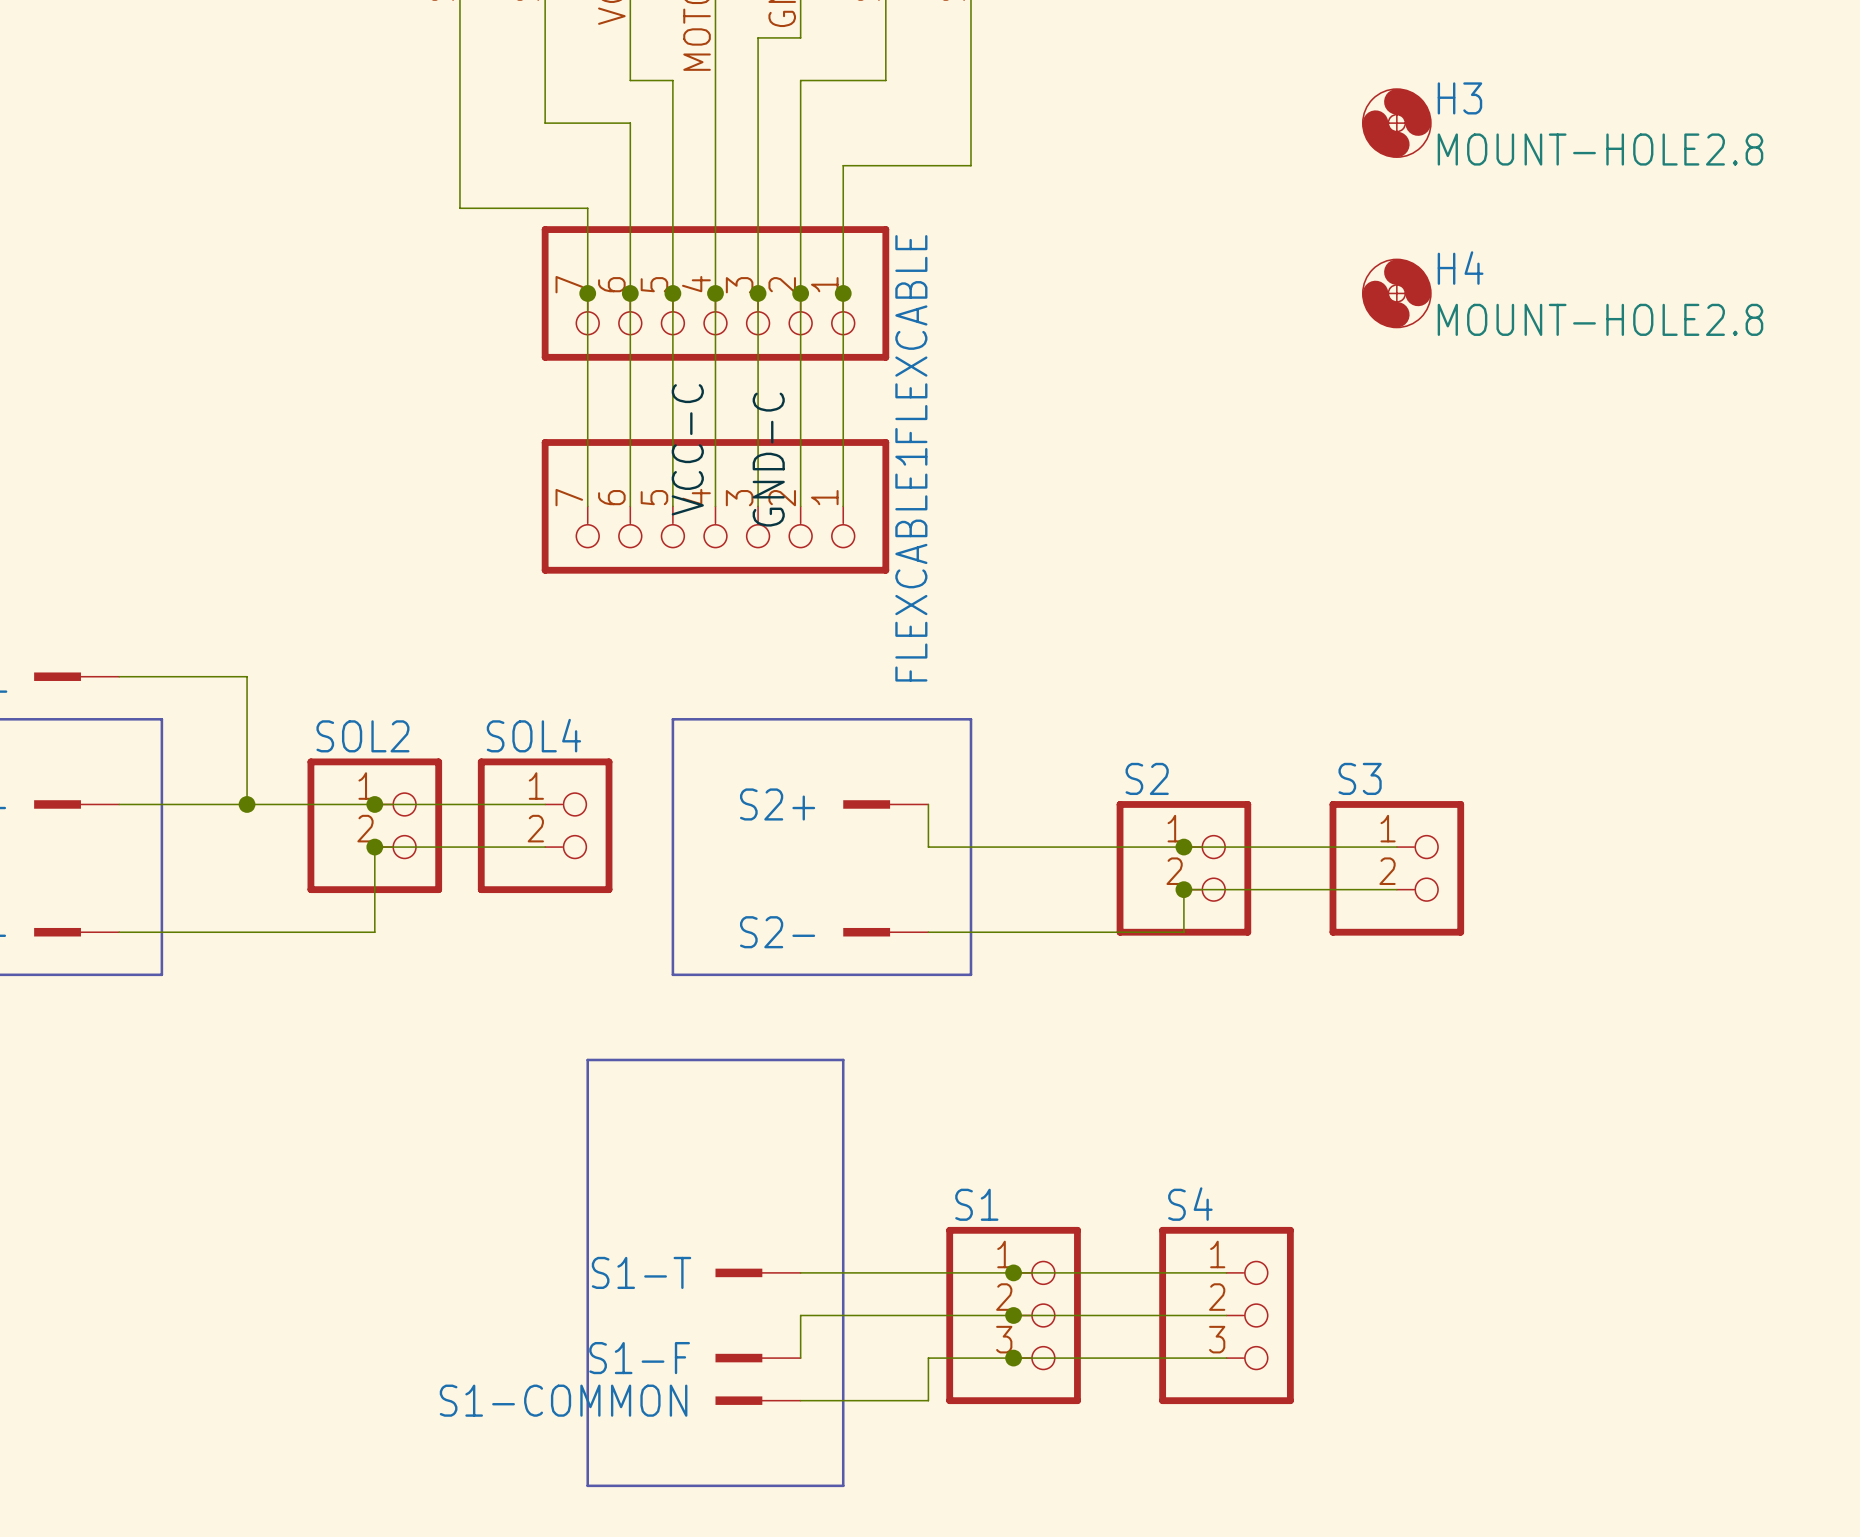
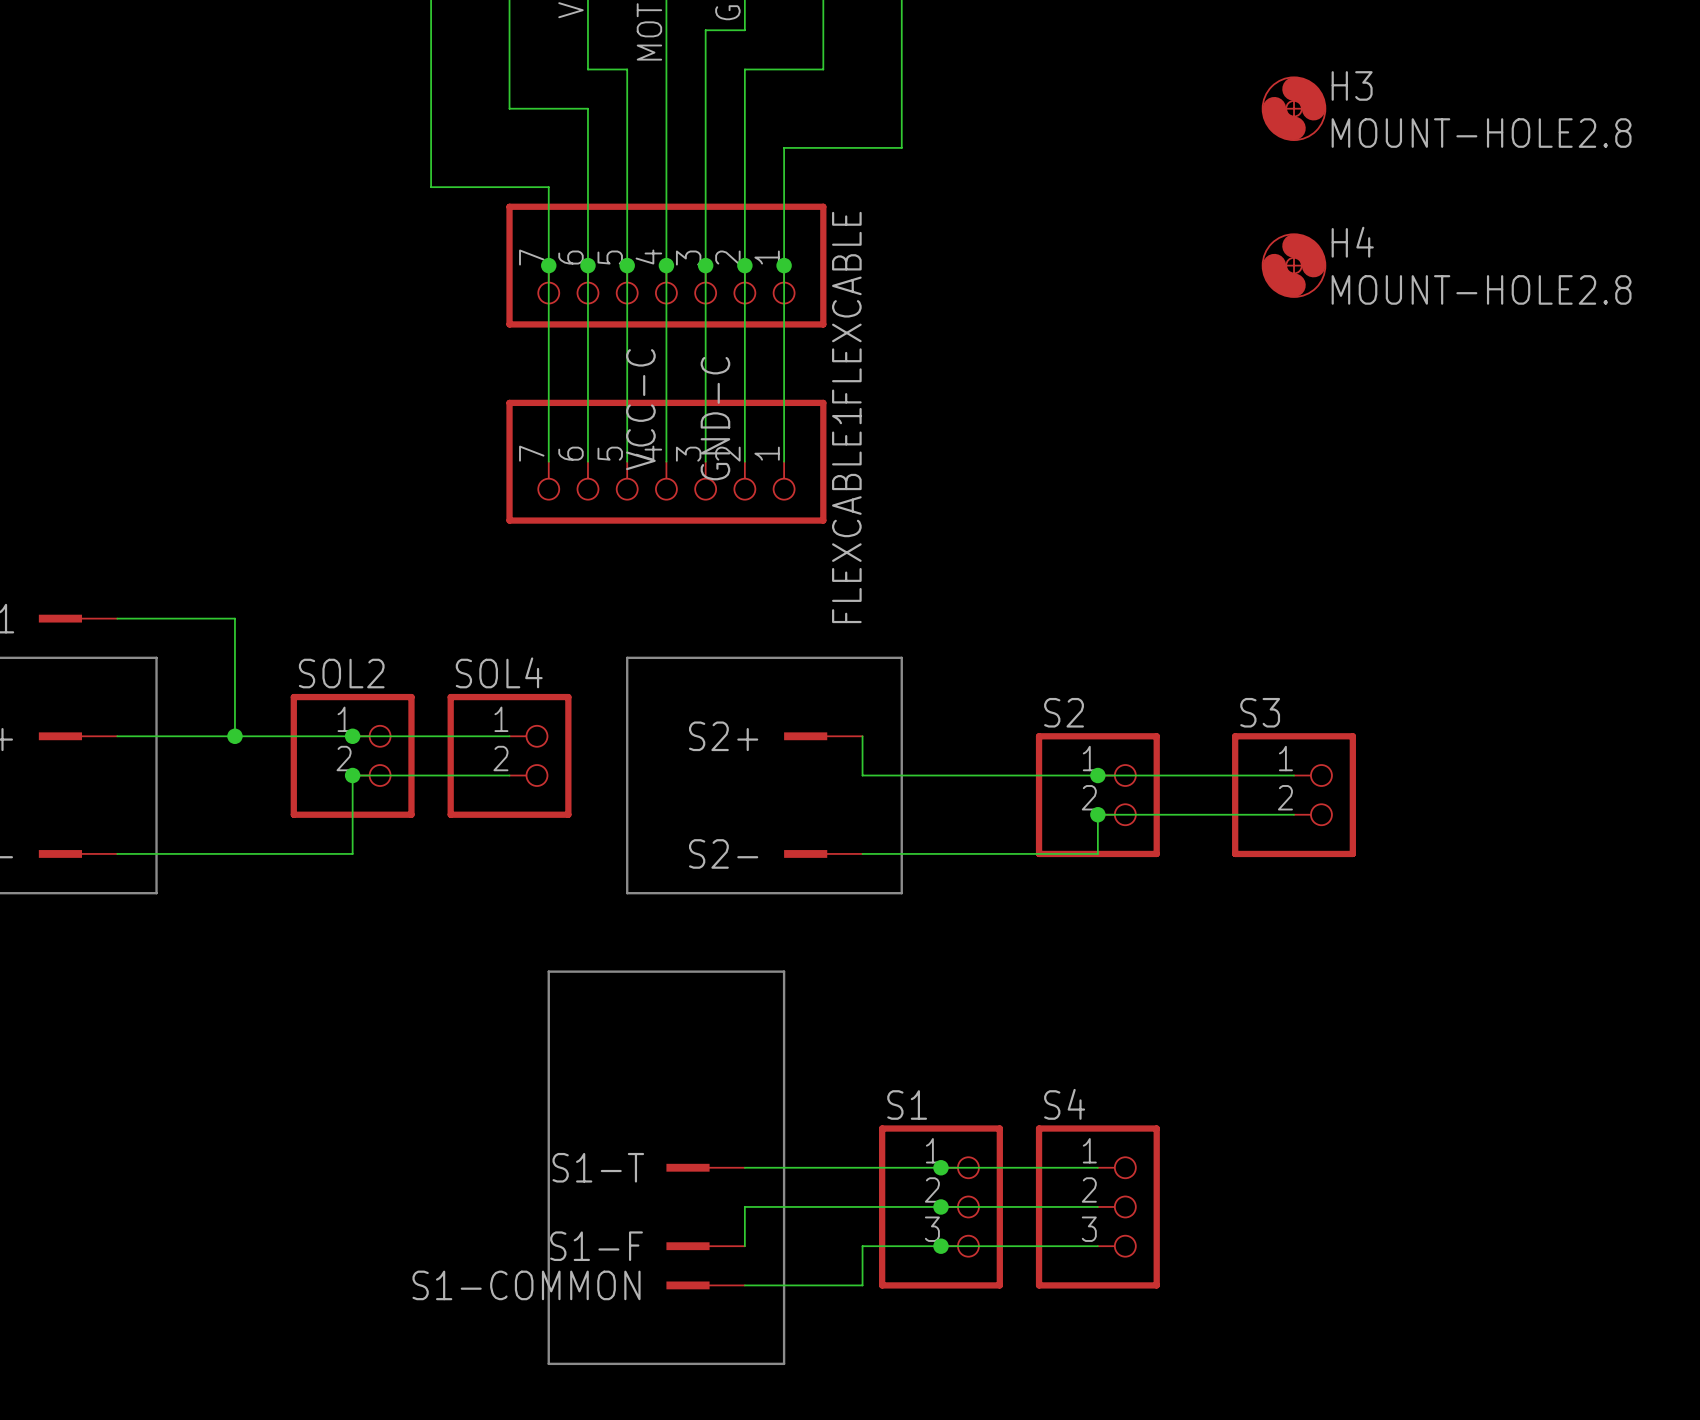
wire: (1183, 1272) (1226, 1272) -> none
wire: (1183, 1315) (1226, 1315) -> none
S4 position: (1226, 1315) -> (1097, 1206)
wire: (1183, 1358) (1226, 1358) -> none

